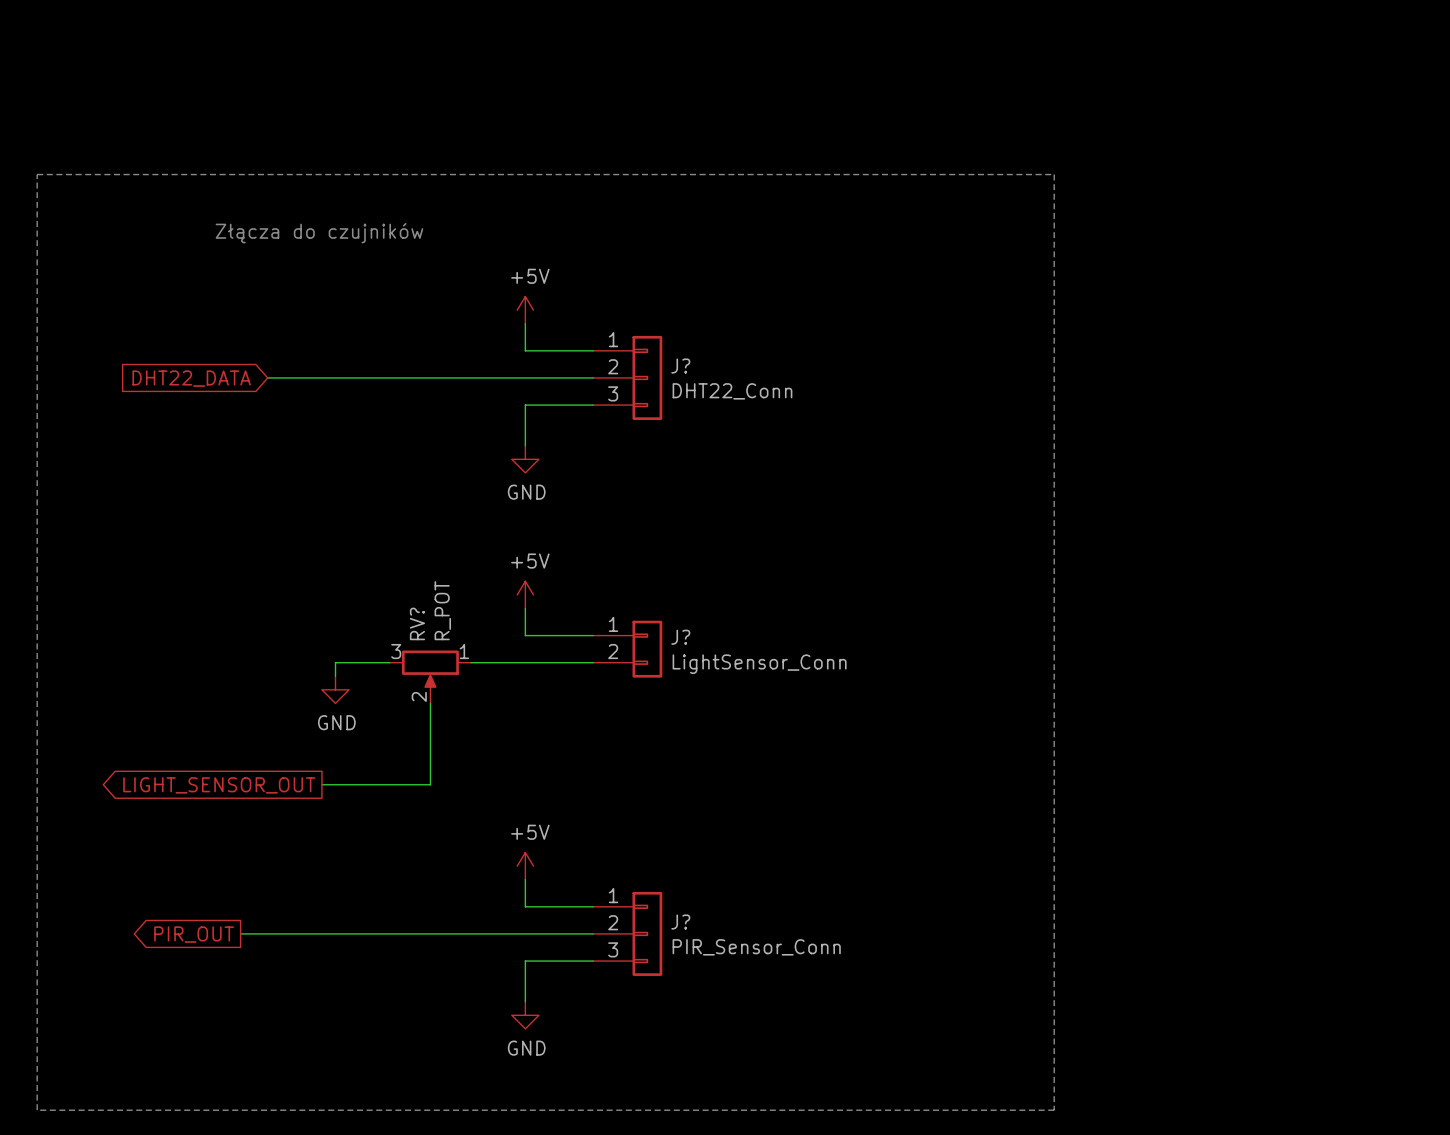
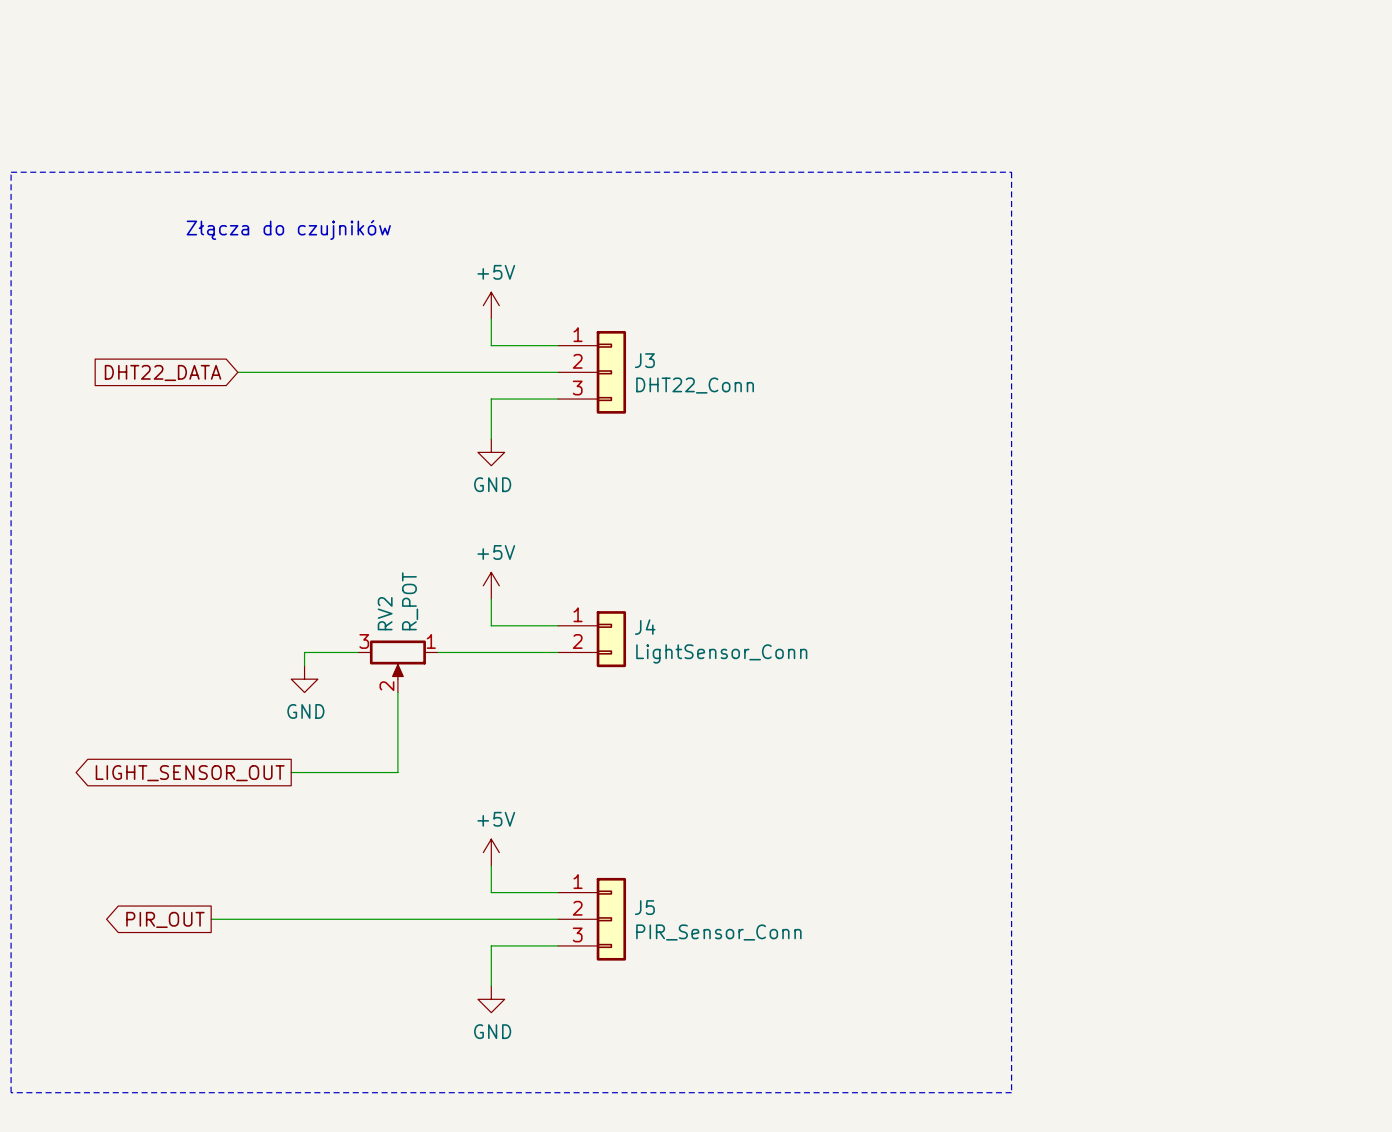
J? name: J? (680, 366) -> J3 (644, 360)
RV? name: RV? (417, 623) -> RV2 (385, 613)
J? name: J? (680, 637) -> J4 (645, 627)
J? name: J? (680, 922) -> J5 (644, 907)

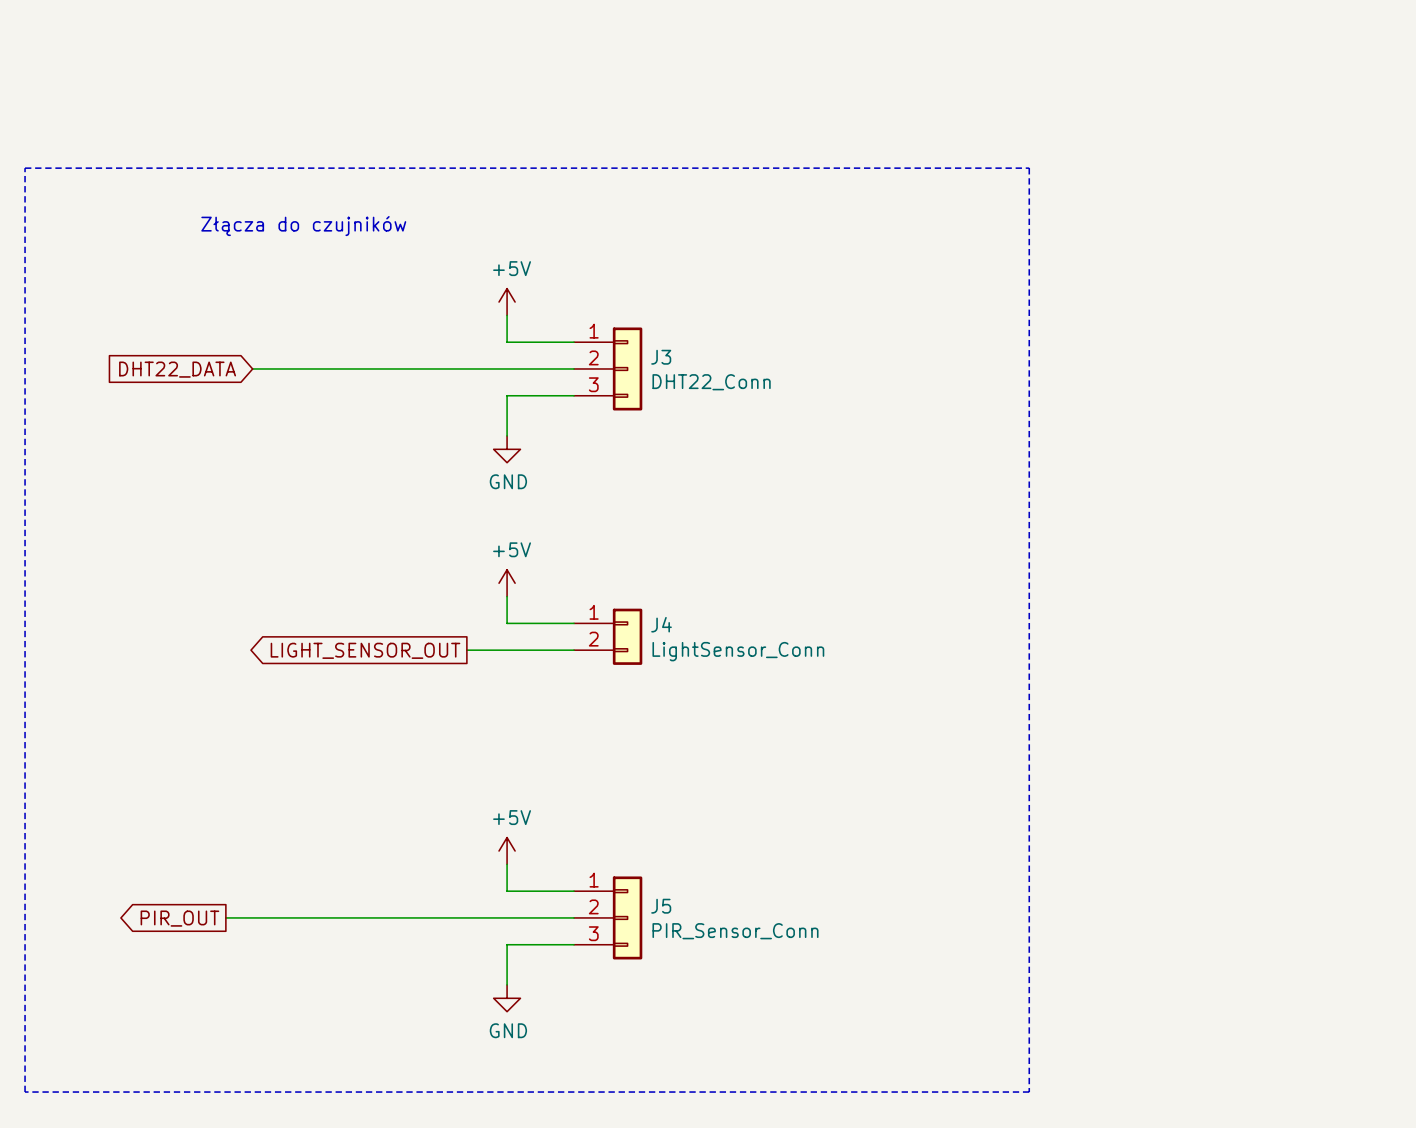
wire: (357, 652) (304, 652) (304, 665) -> none
wire: (437, 652) (451, 652) -> none
RV2: R_POT (397, 666) -> none
power symbol: GND (304, 679) -> none
wire: (397, 692) (397, 772) (291, 772) -> none
global label position: LIGHT_SENSOR_OUT (190, 773) -> LIGHT_SENSOR_OUT (365, 650)

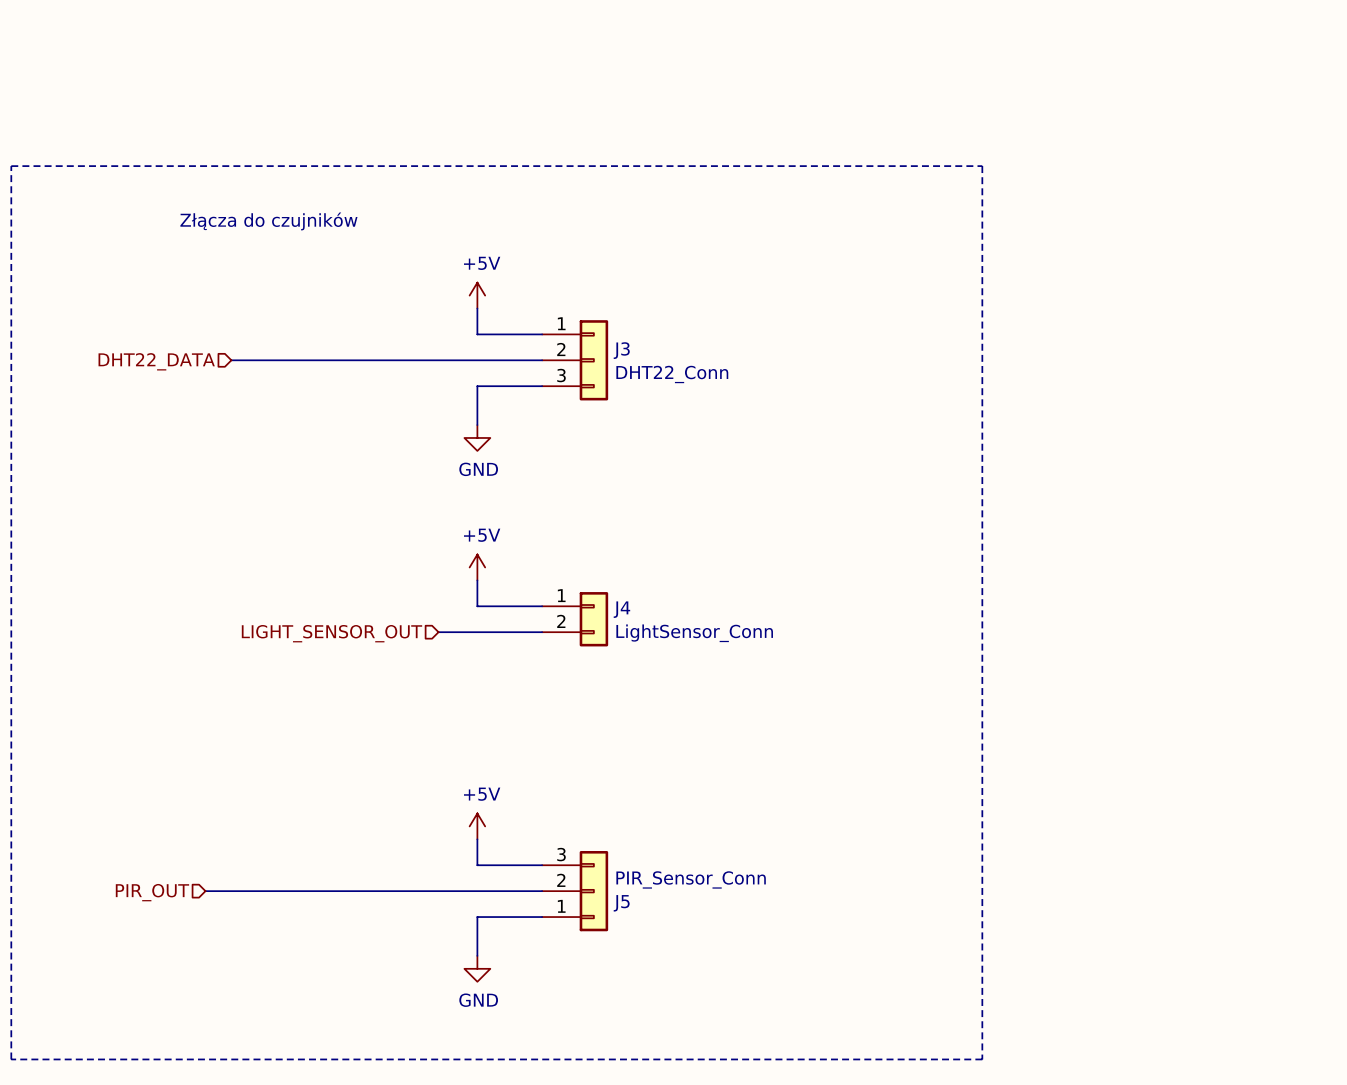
hierarchical label: none -> DHT22_DATA (156, 361)
global label: DHT22_DATA (177, 369) -> none
hierarchical label: none -> LIGHT_SENSOR_OUT (331, 633)
global label: LIGHT_SENSOR_OUT (365, 650) -> none
J5 flip: as is (627, 917) -> up-down (593, 891)
hierarchical label: none -> PIR_OUT (152, 892)
global label: PIR_OUT (179, 918) -> none

